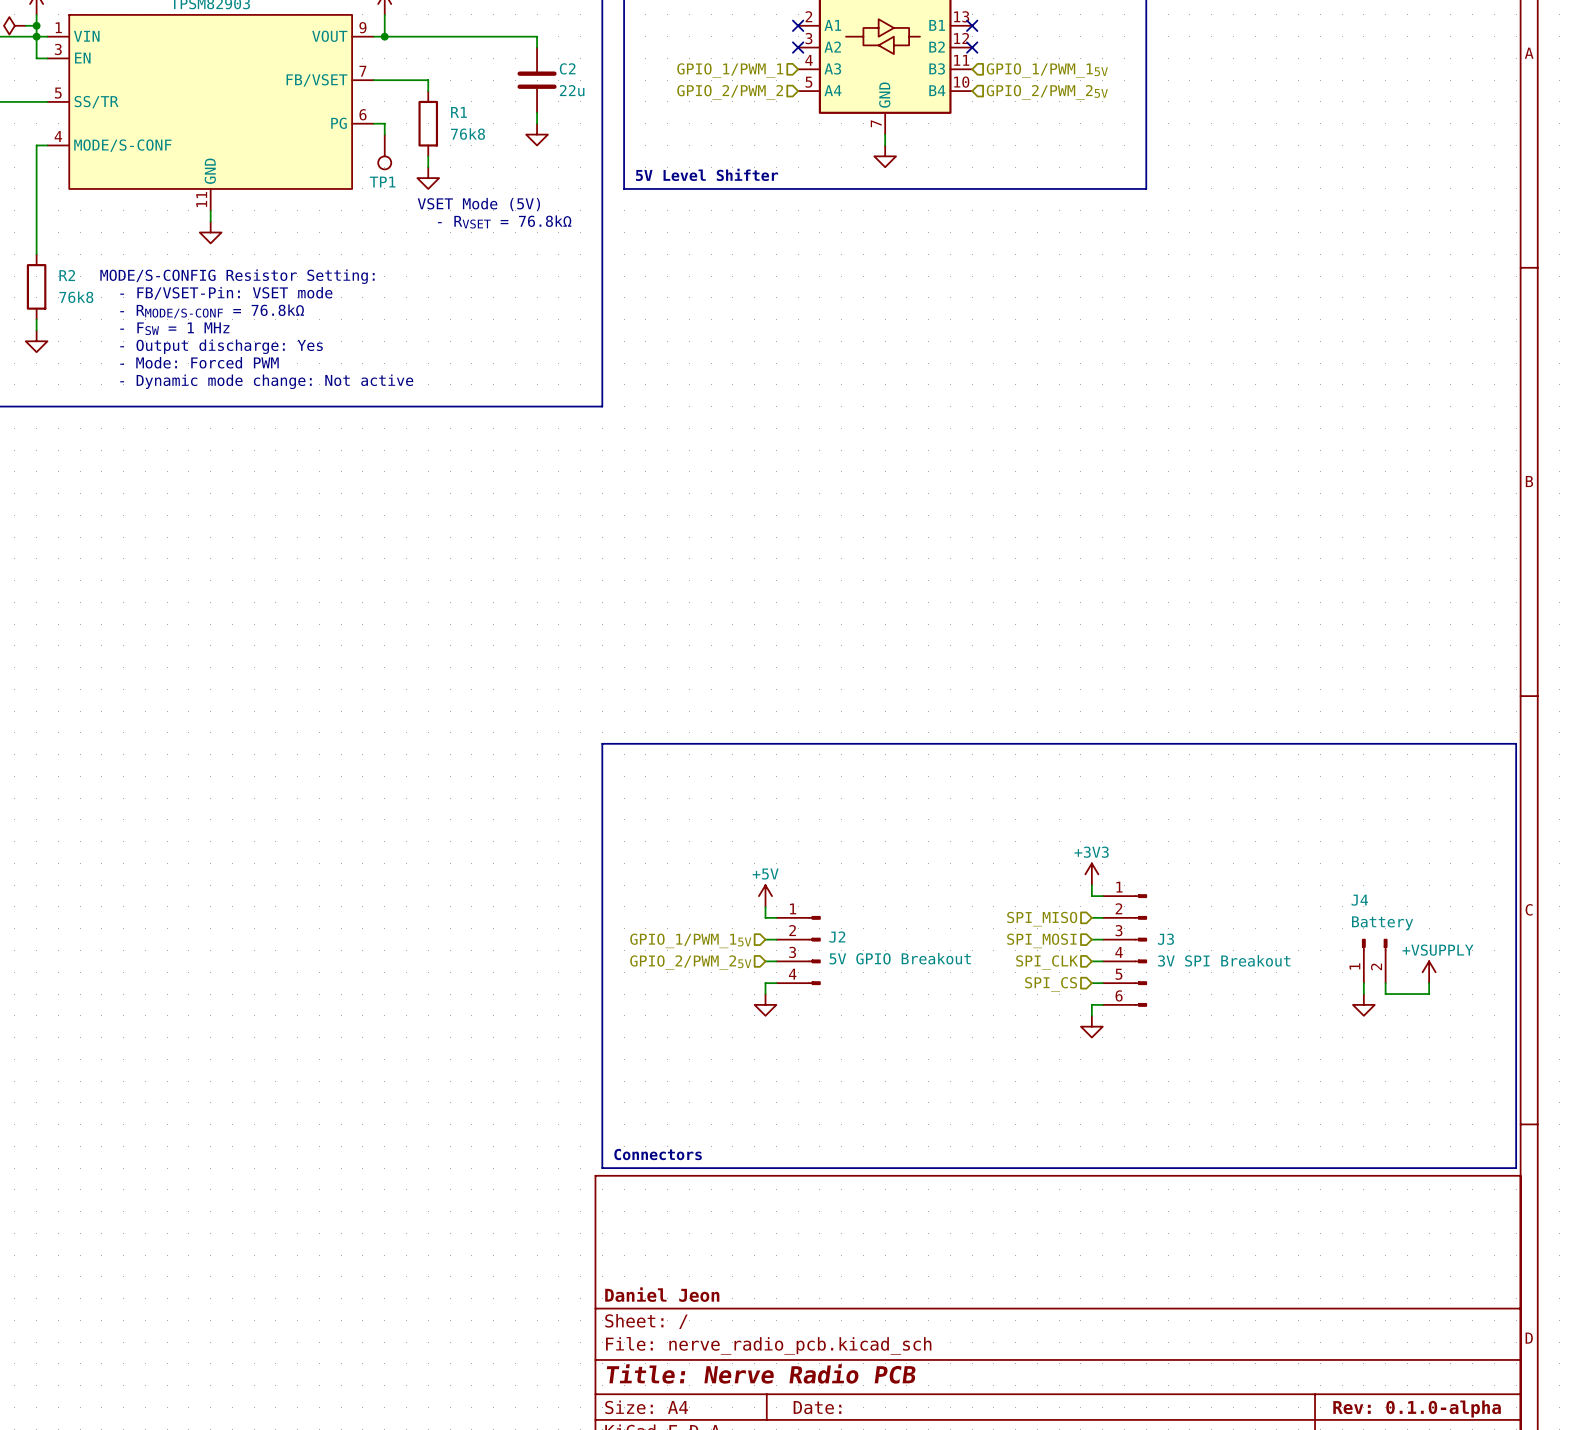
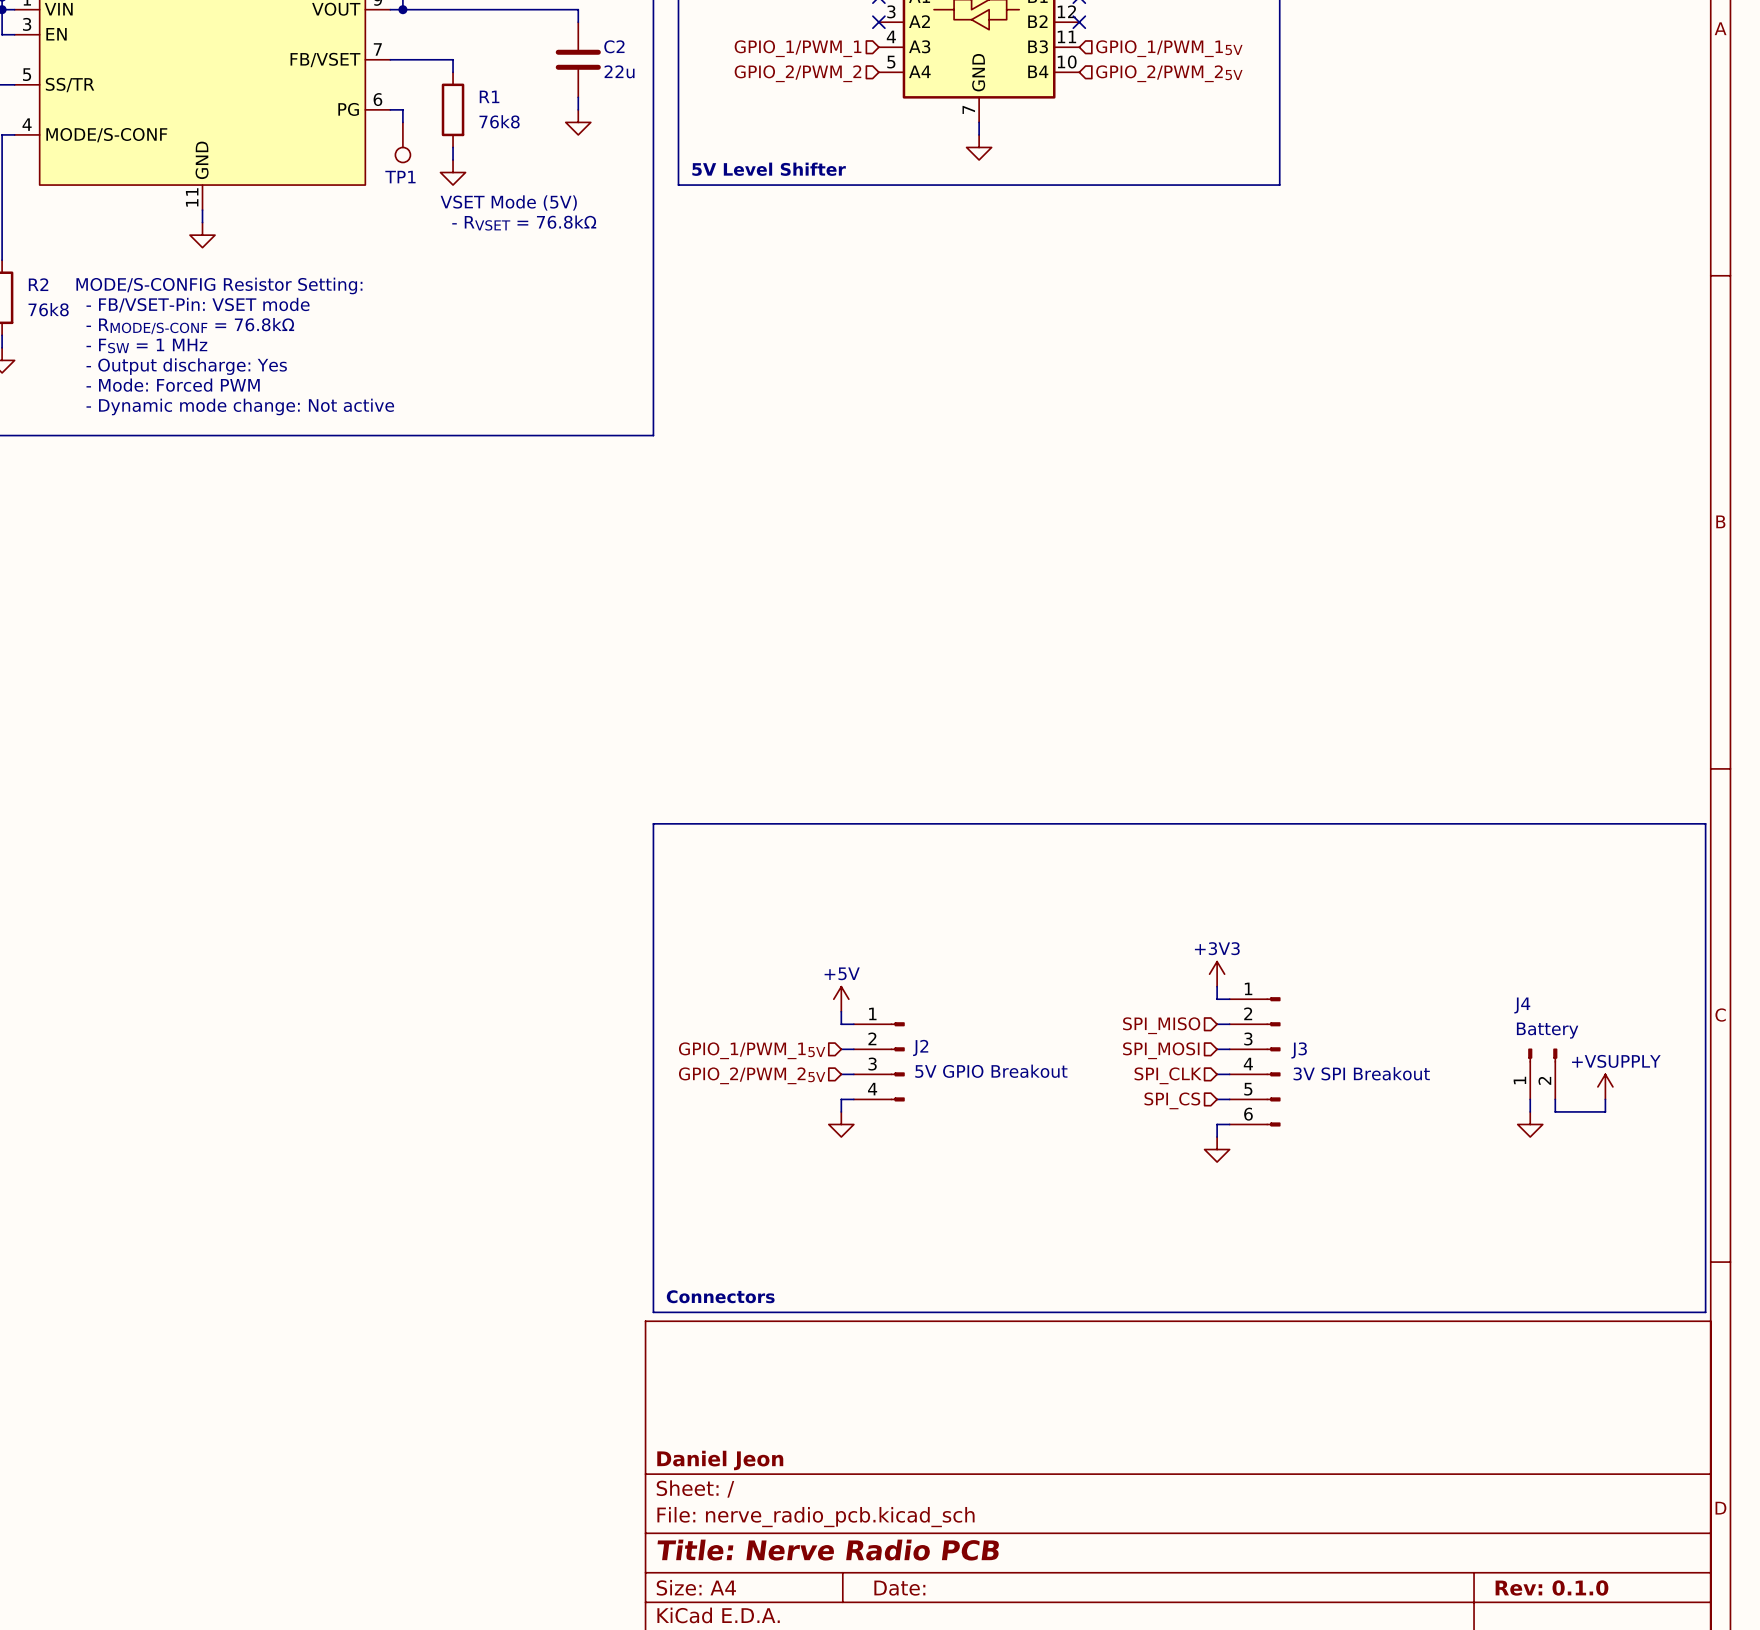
title block: Rev: 0.1.0-alpha (1417, 1409) -> Rev: 0.1.0 (1551, 1587)

